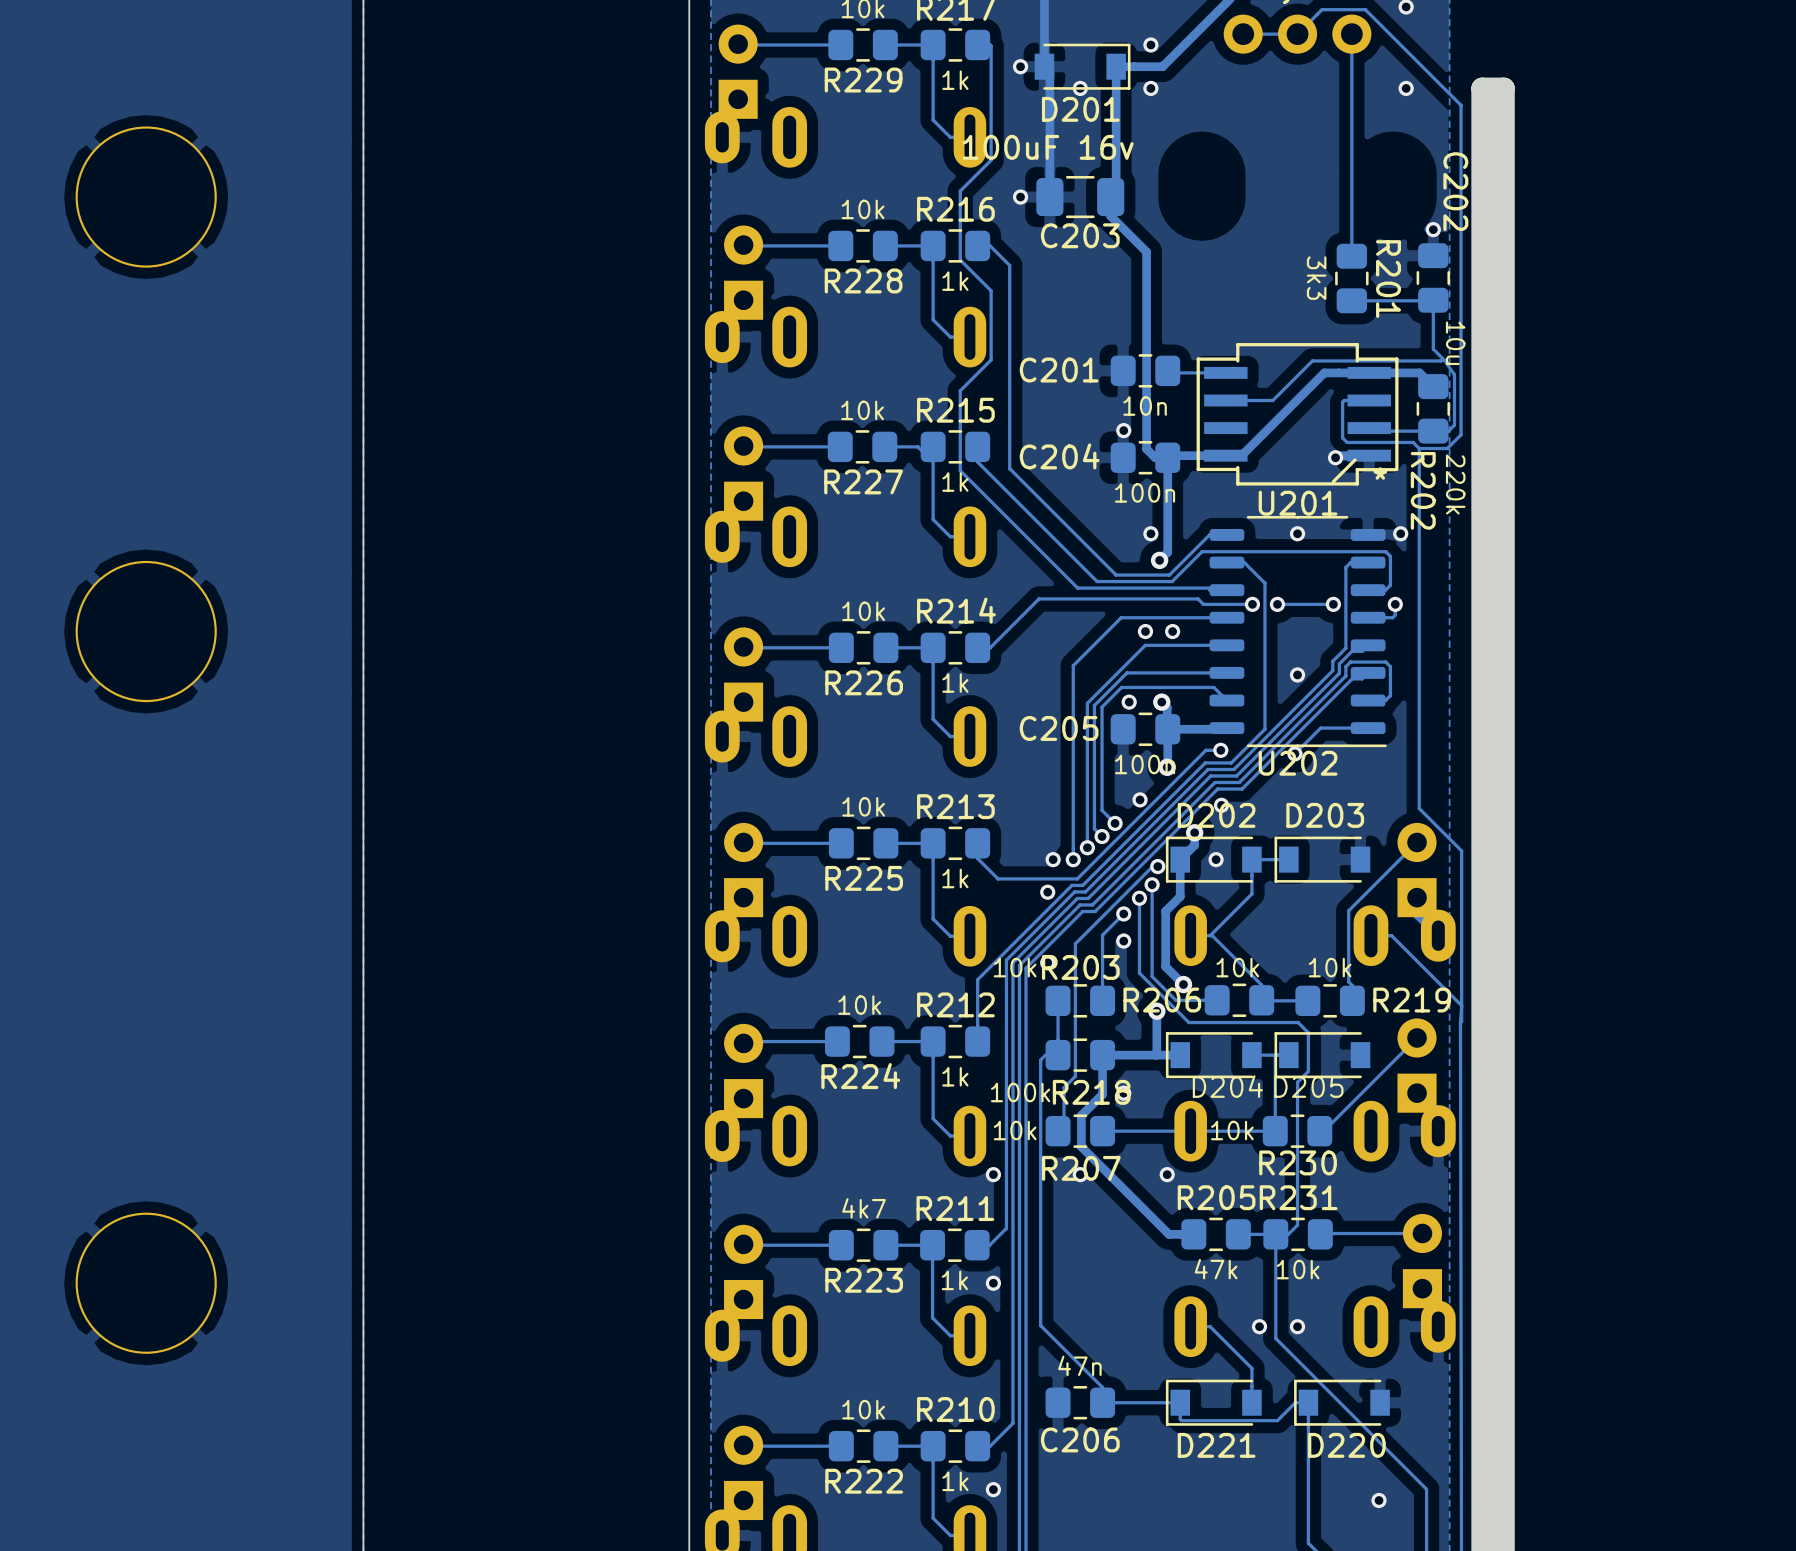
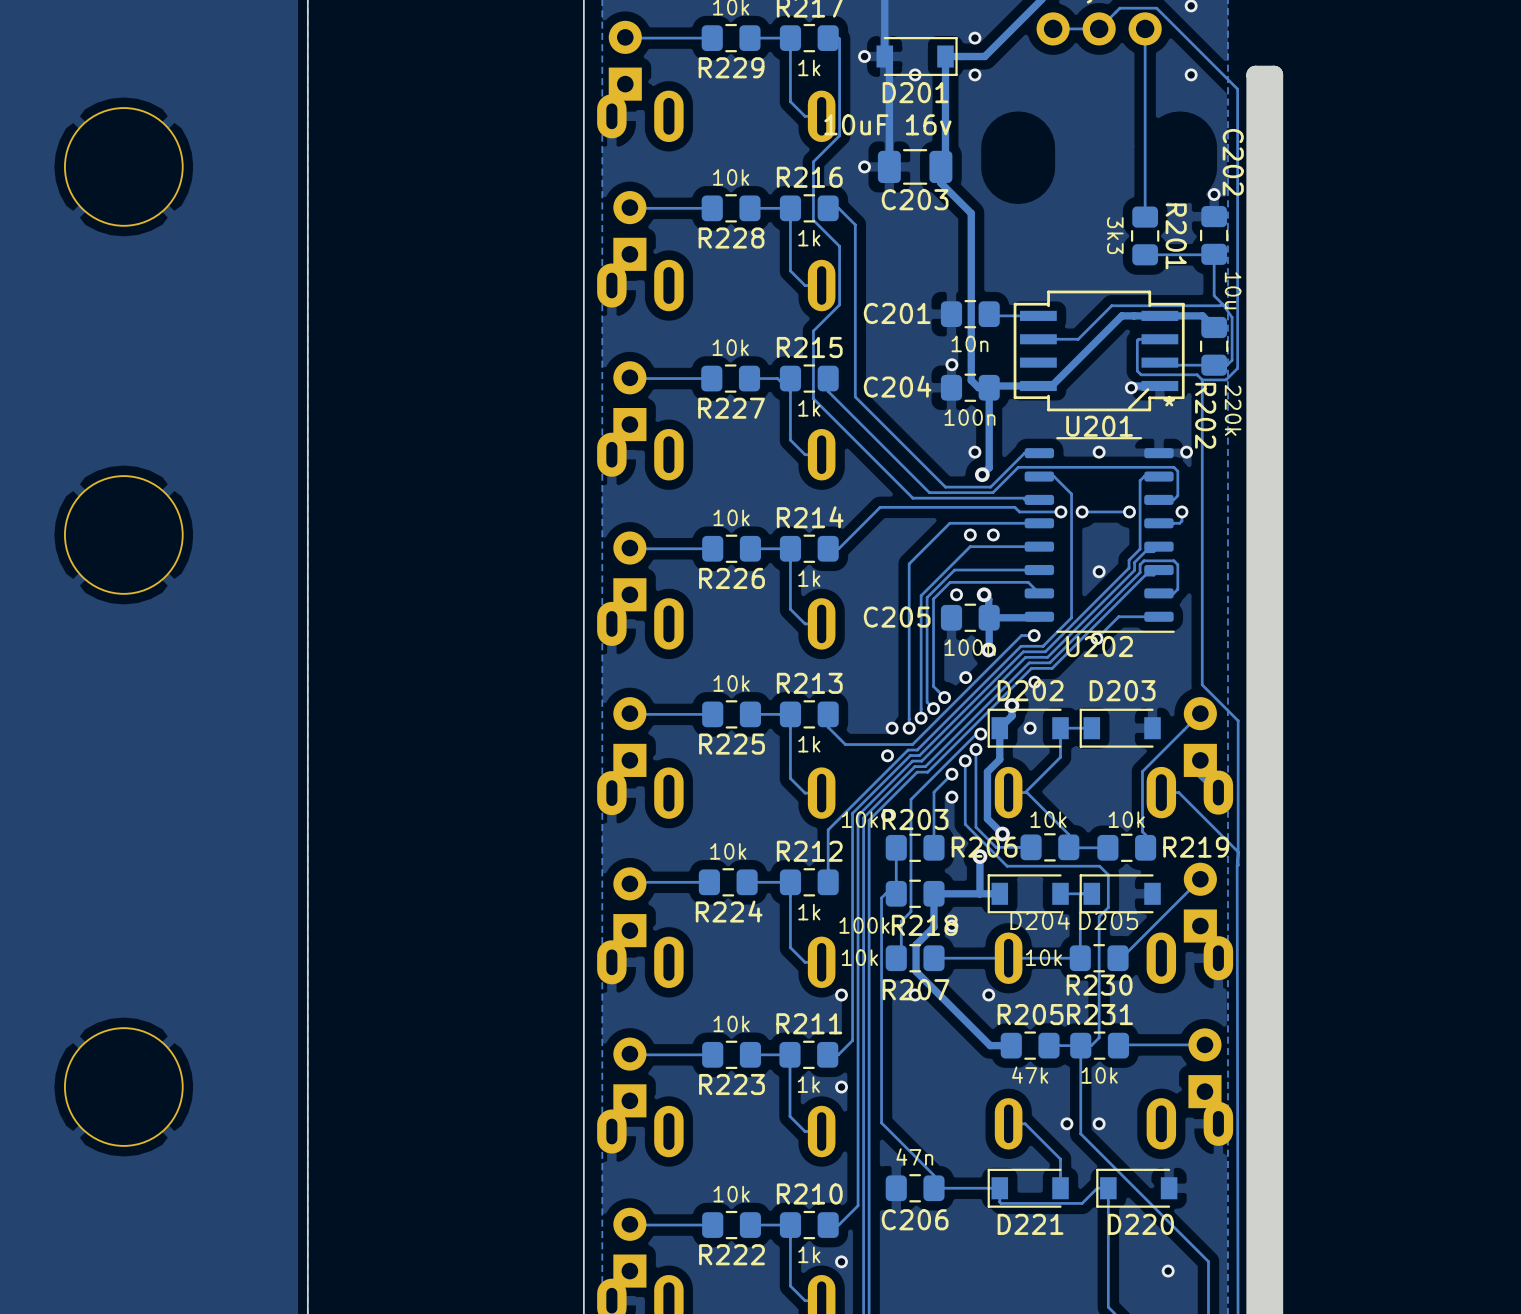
C203 value: 100uF 16v (1048, 147) -> 10uF 16v (887, 124)
R223 value: 4k7 (864, 1208) -> 10k (731, 1023)

